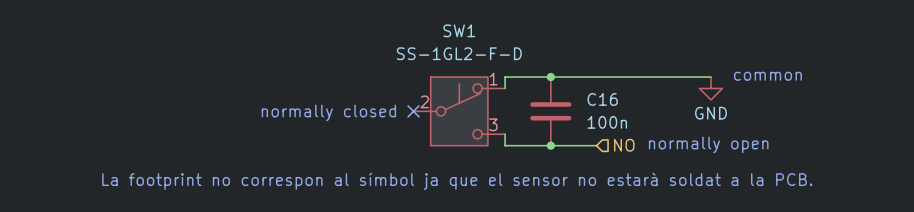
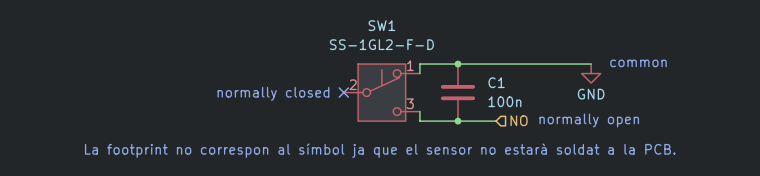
C16 name: C16 (602, 99) -> C1 (496, 82)

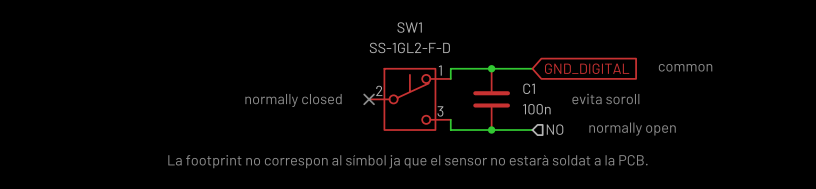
wire: (496, 64) (591, 64) -> none
global label: none -> GND_DIGITAL (587, 68)
power symbol: GND (591, 73) -> none
text: none -> evita soroll (605, 99)

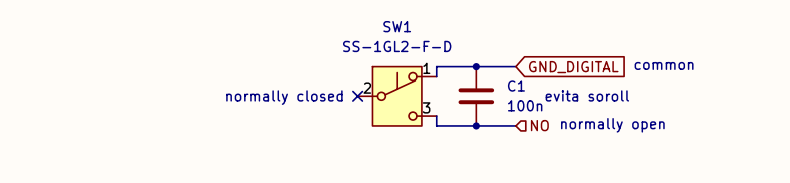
text: La footprint no correspon al símbol ja que el sensor no estarà soldat a la PCB. (407, 161) -> none

